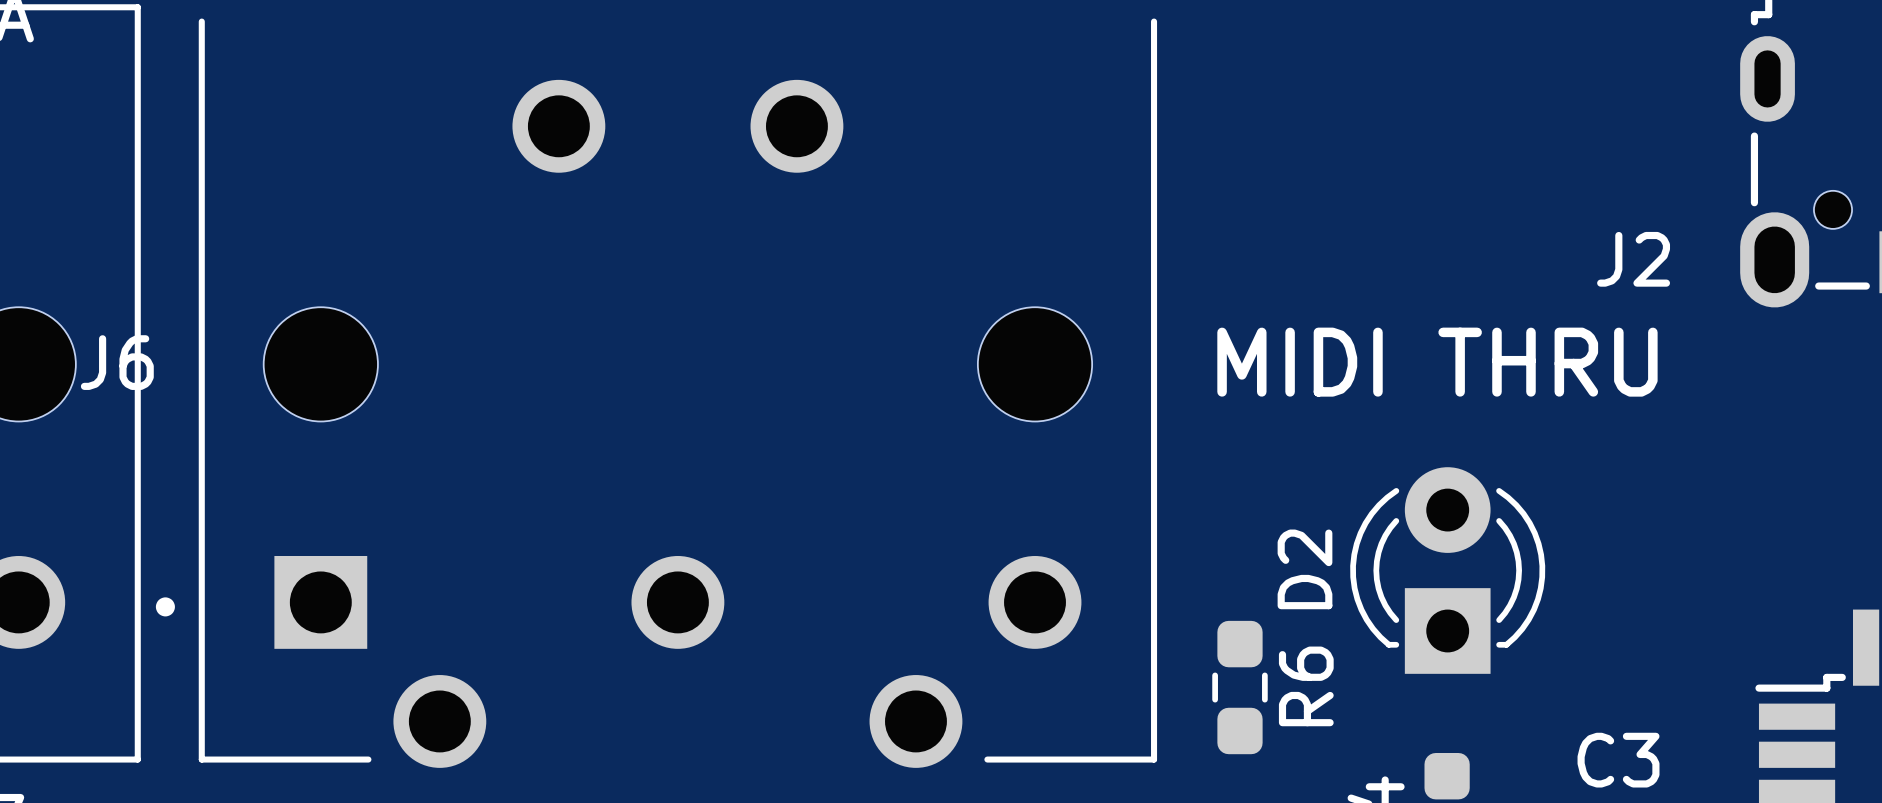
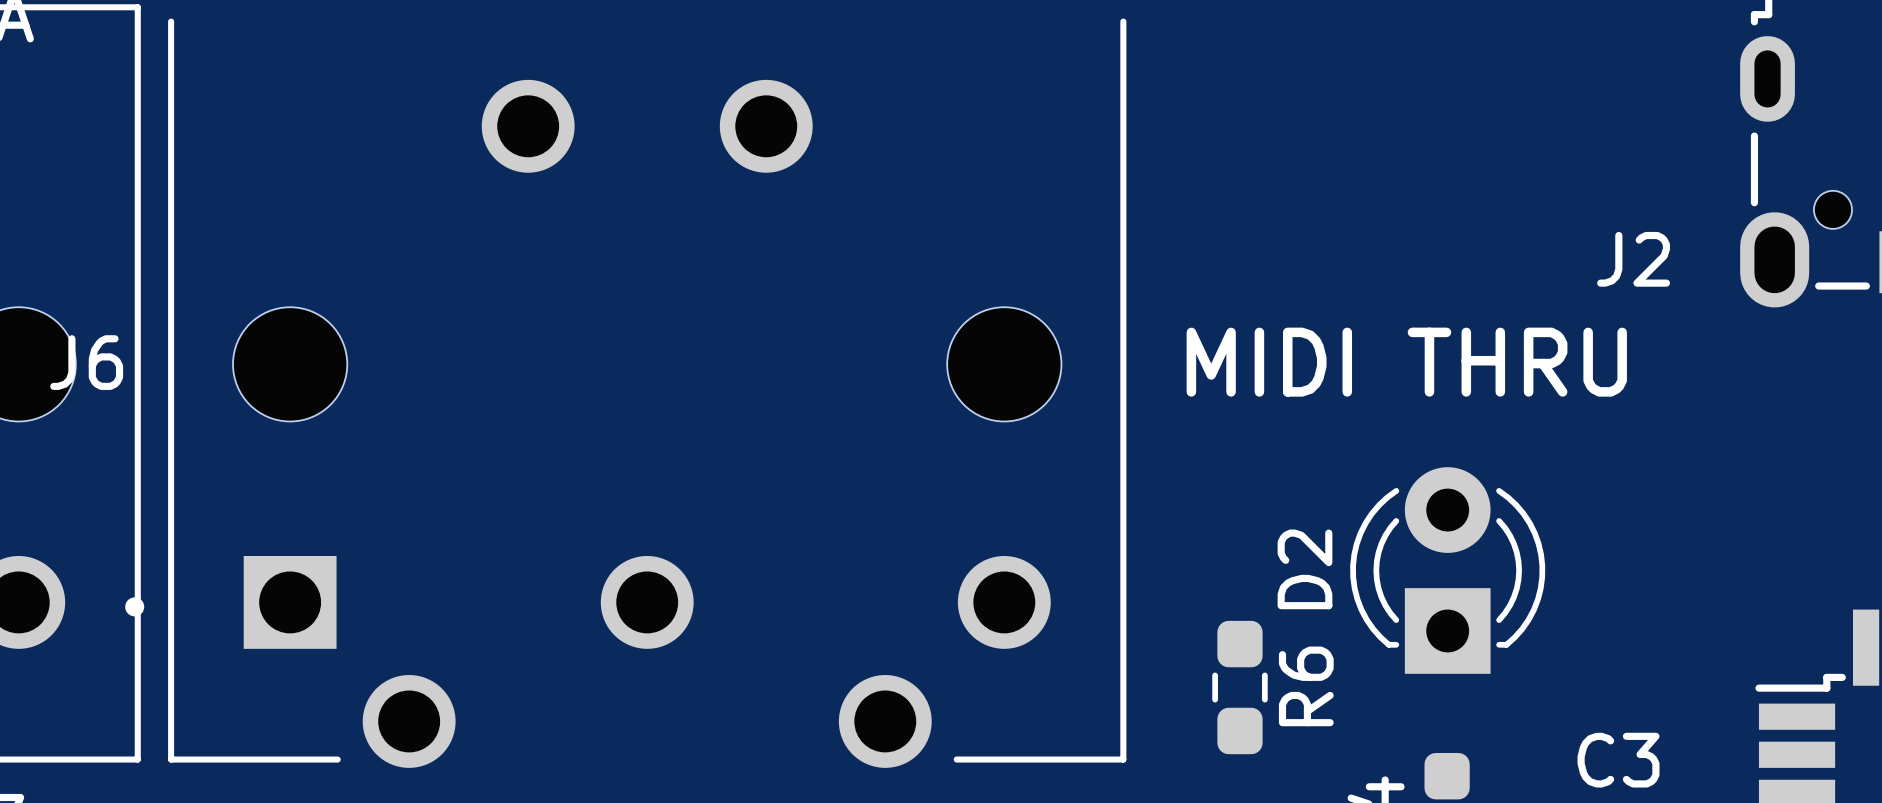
J6 position: (656, 393) -> (625, 393)

